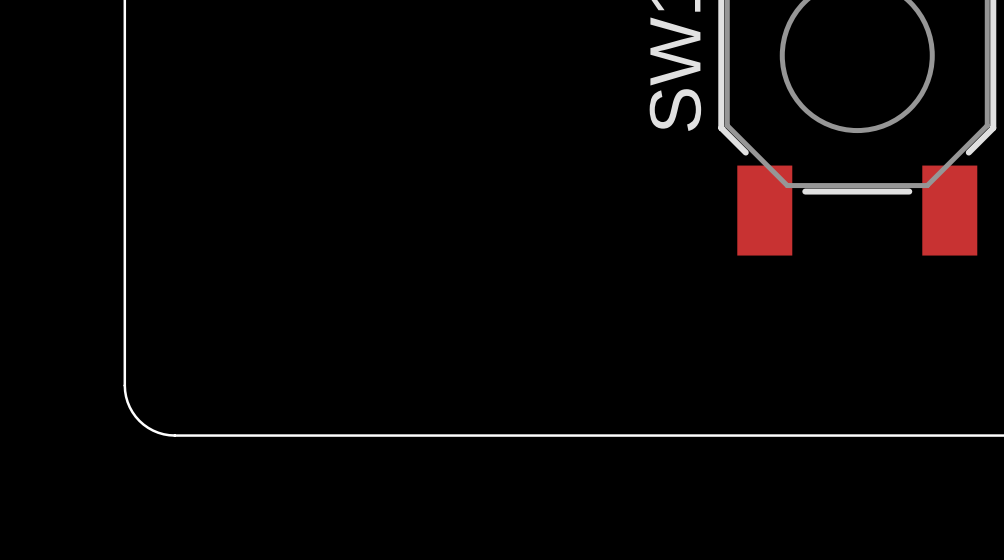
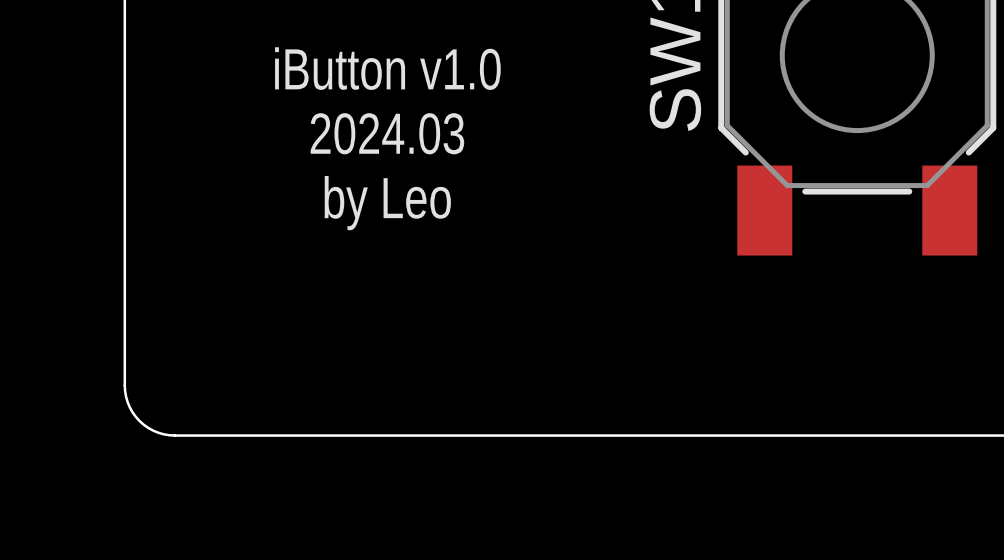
text: none -> iButton v1.0 (387, 68)
text: none -> 2024.03 (387, 133)
text: none -> by Leo (387, 203)

